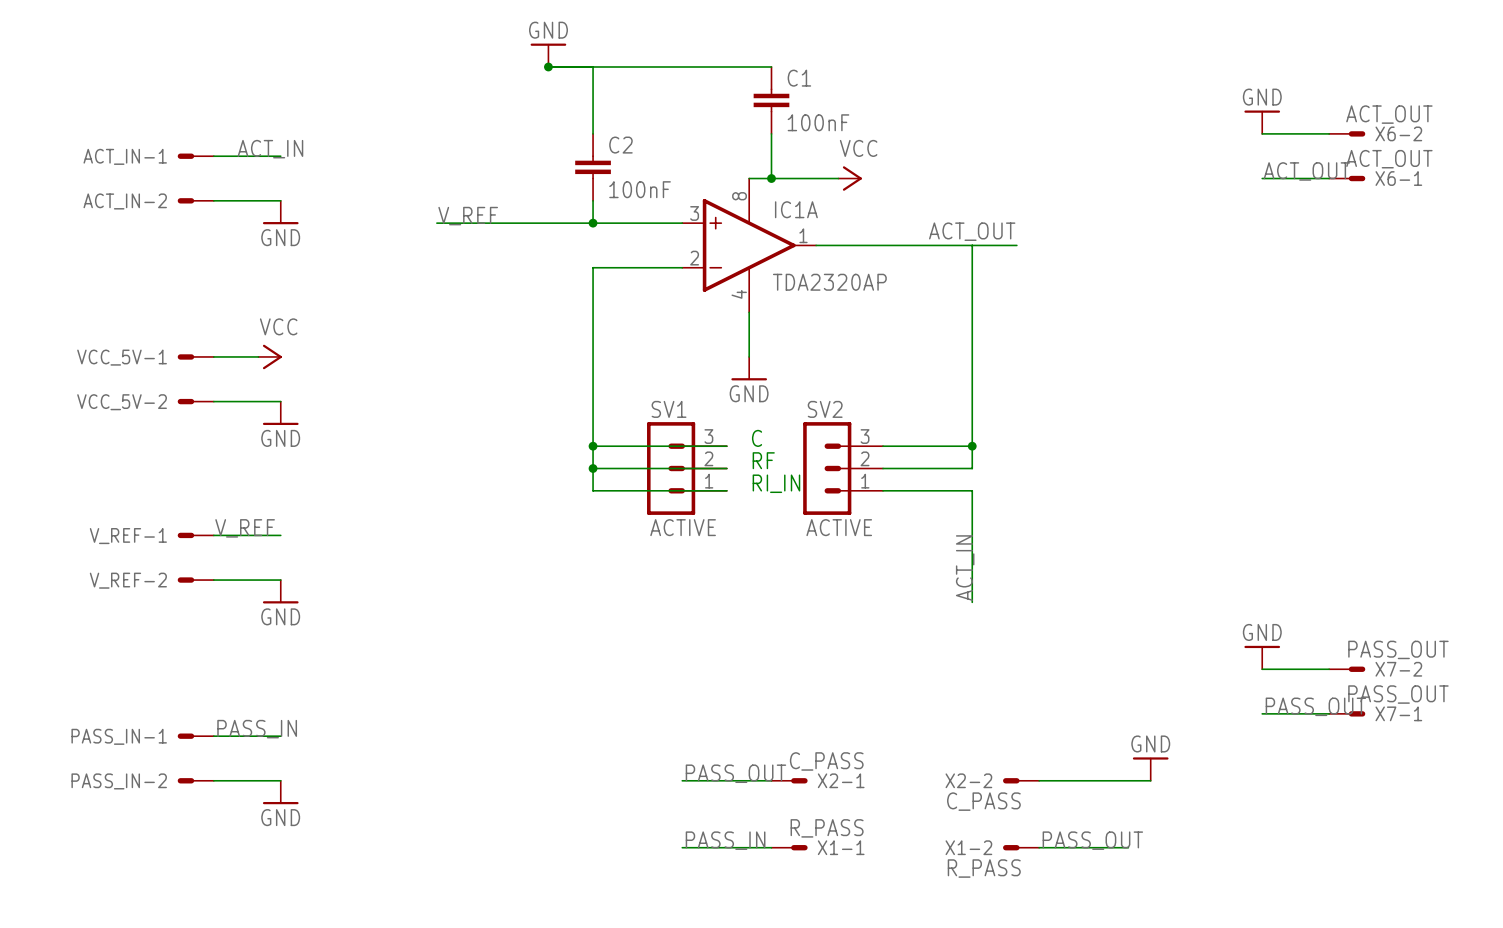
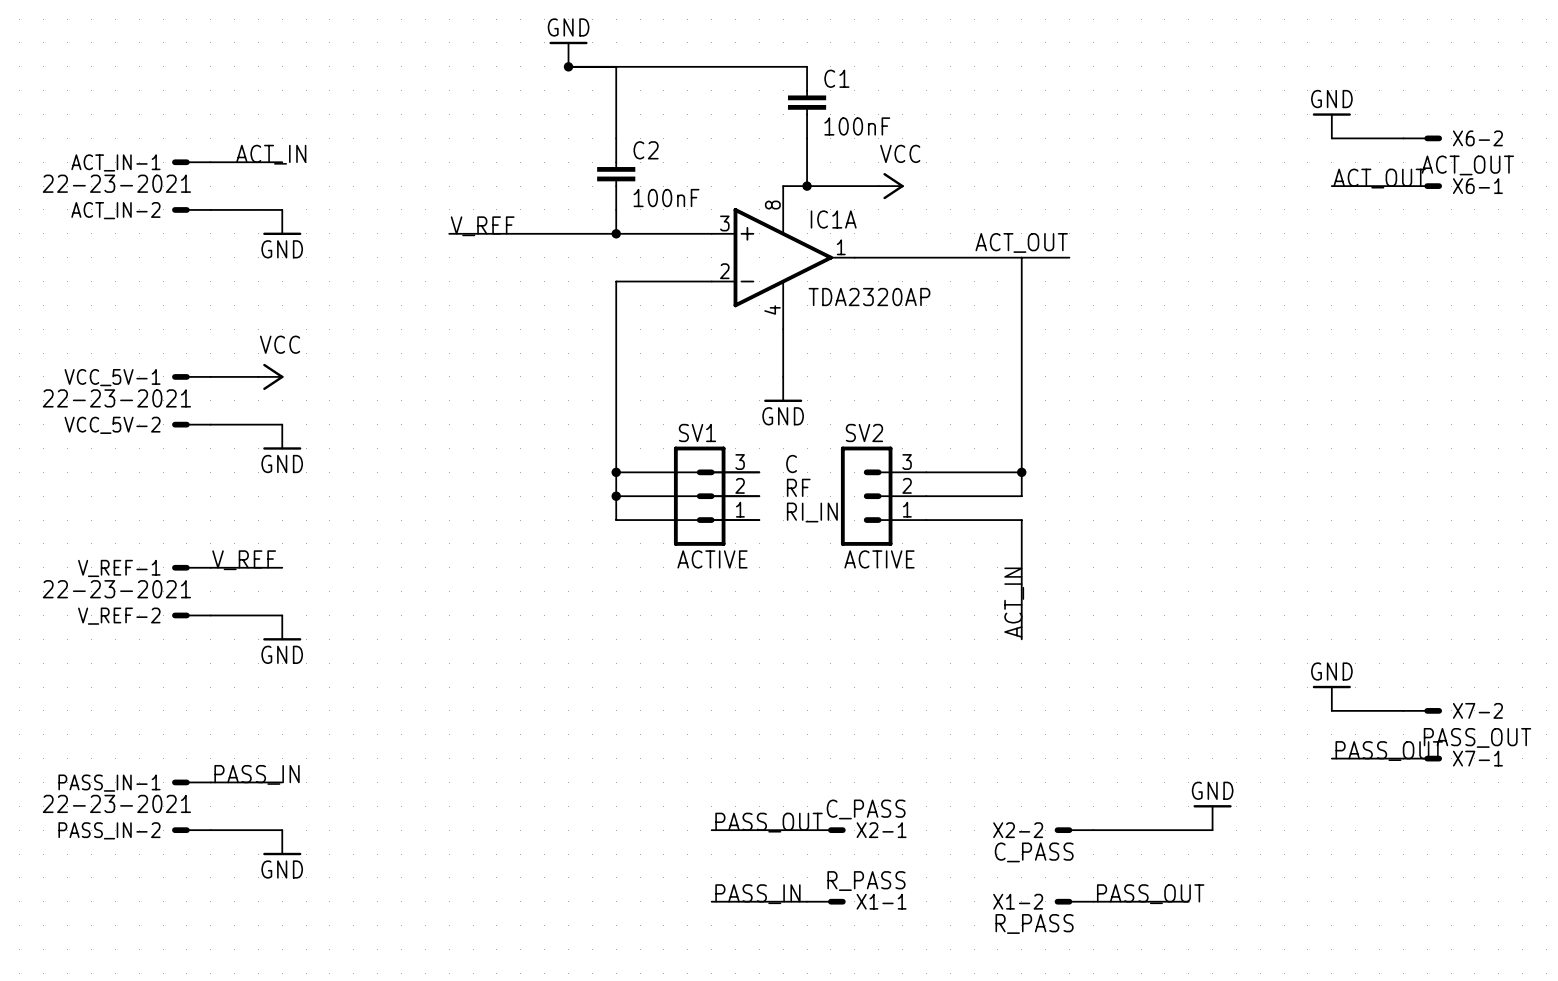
X6-2 value: ACT_OUT (1389, 114) -> none
ACT_IN-1 value: none -> 22-23-2021 (116, 183)
VCC_5V-1 value: none -> 22-23-2021 (116, 398)
V_REF-1 value: none -> 22-23-2021 (116, 589)
X7-2 value: PASS_OUT (1398, 649) -> none
PASS_IN-1 value: none -> 22-23-2021 (116, 803)

